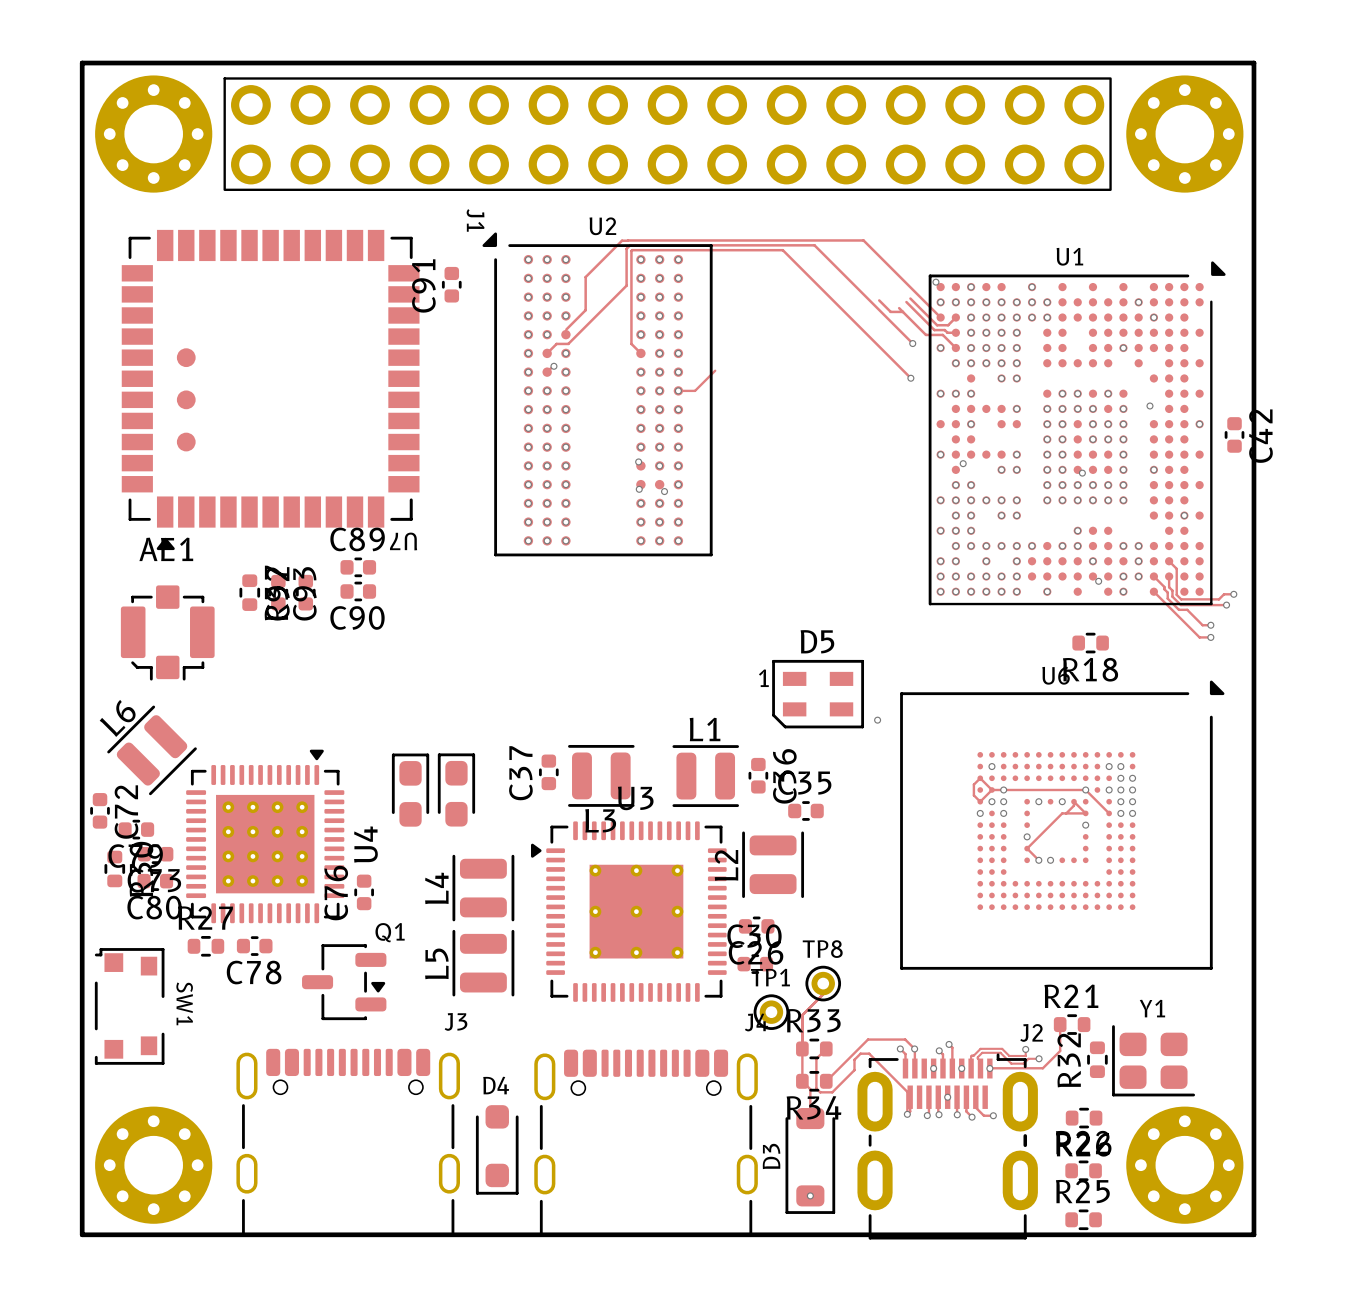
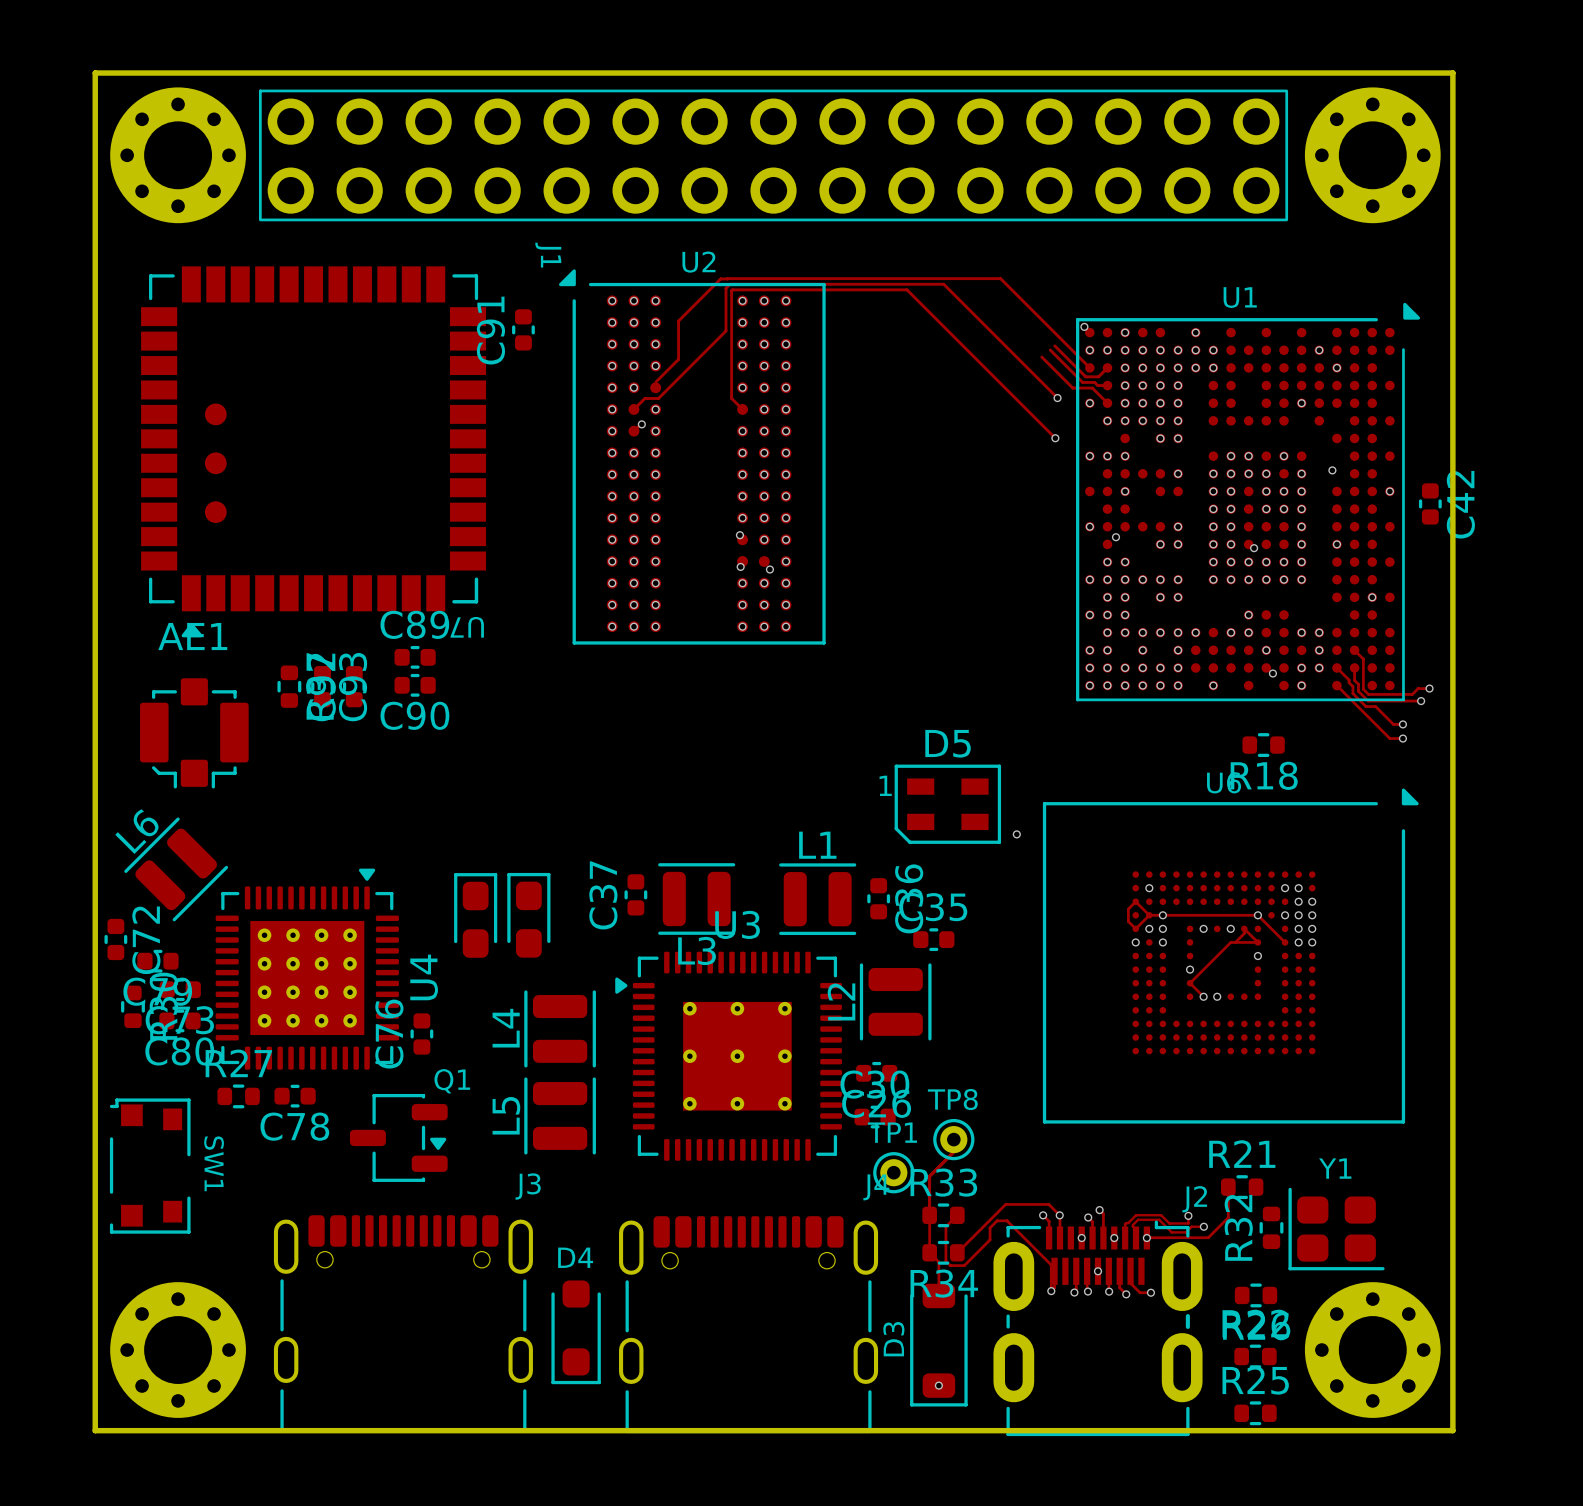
track: (879, 300) (890, 311) (902, 311) -> none
track: (715, 370) (695, 390) (678, 390) -> none

